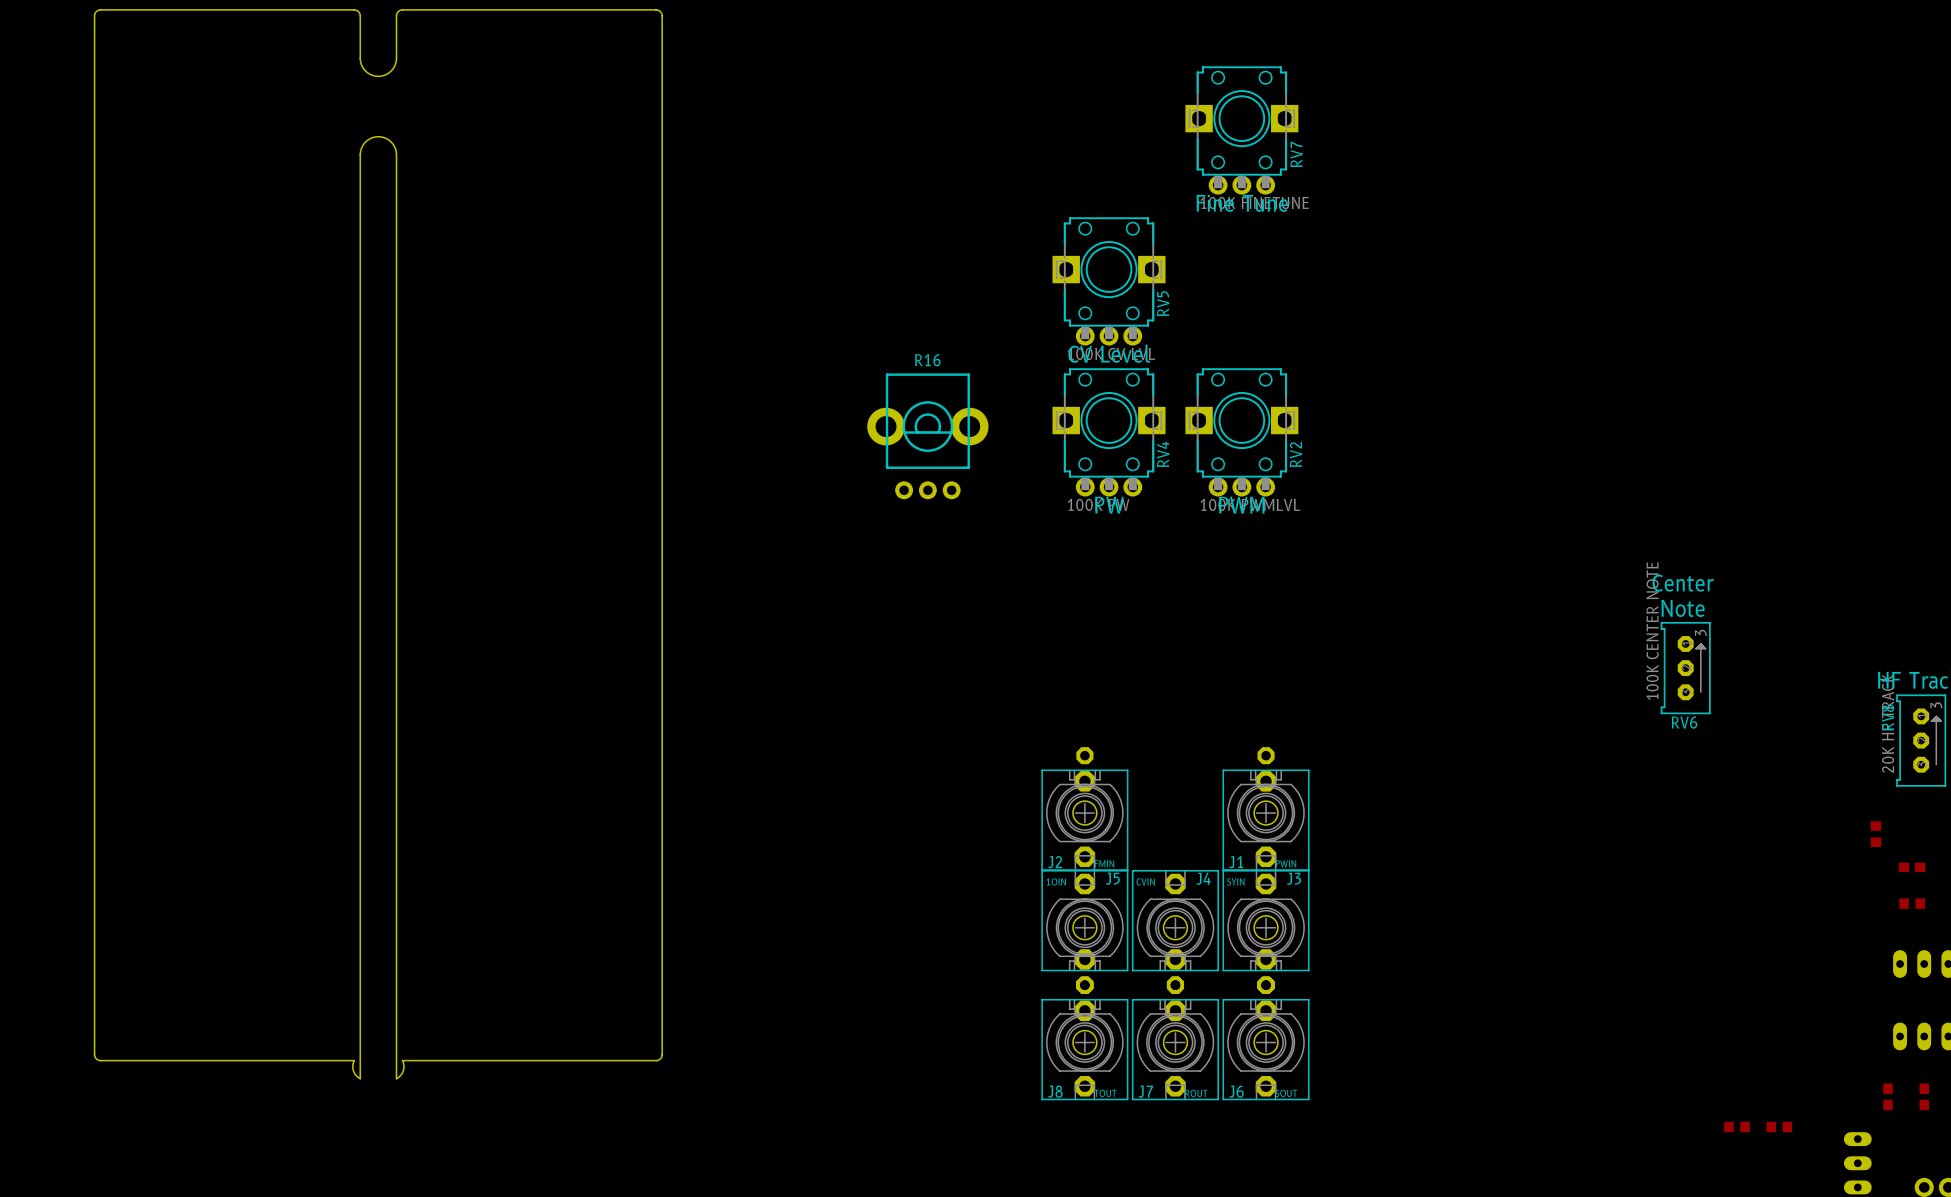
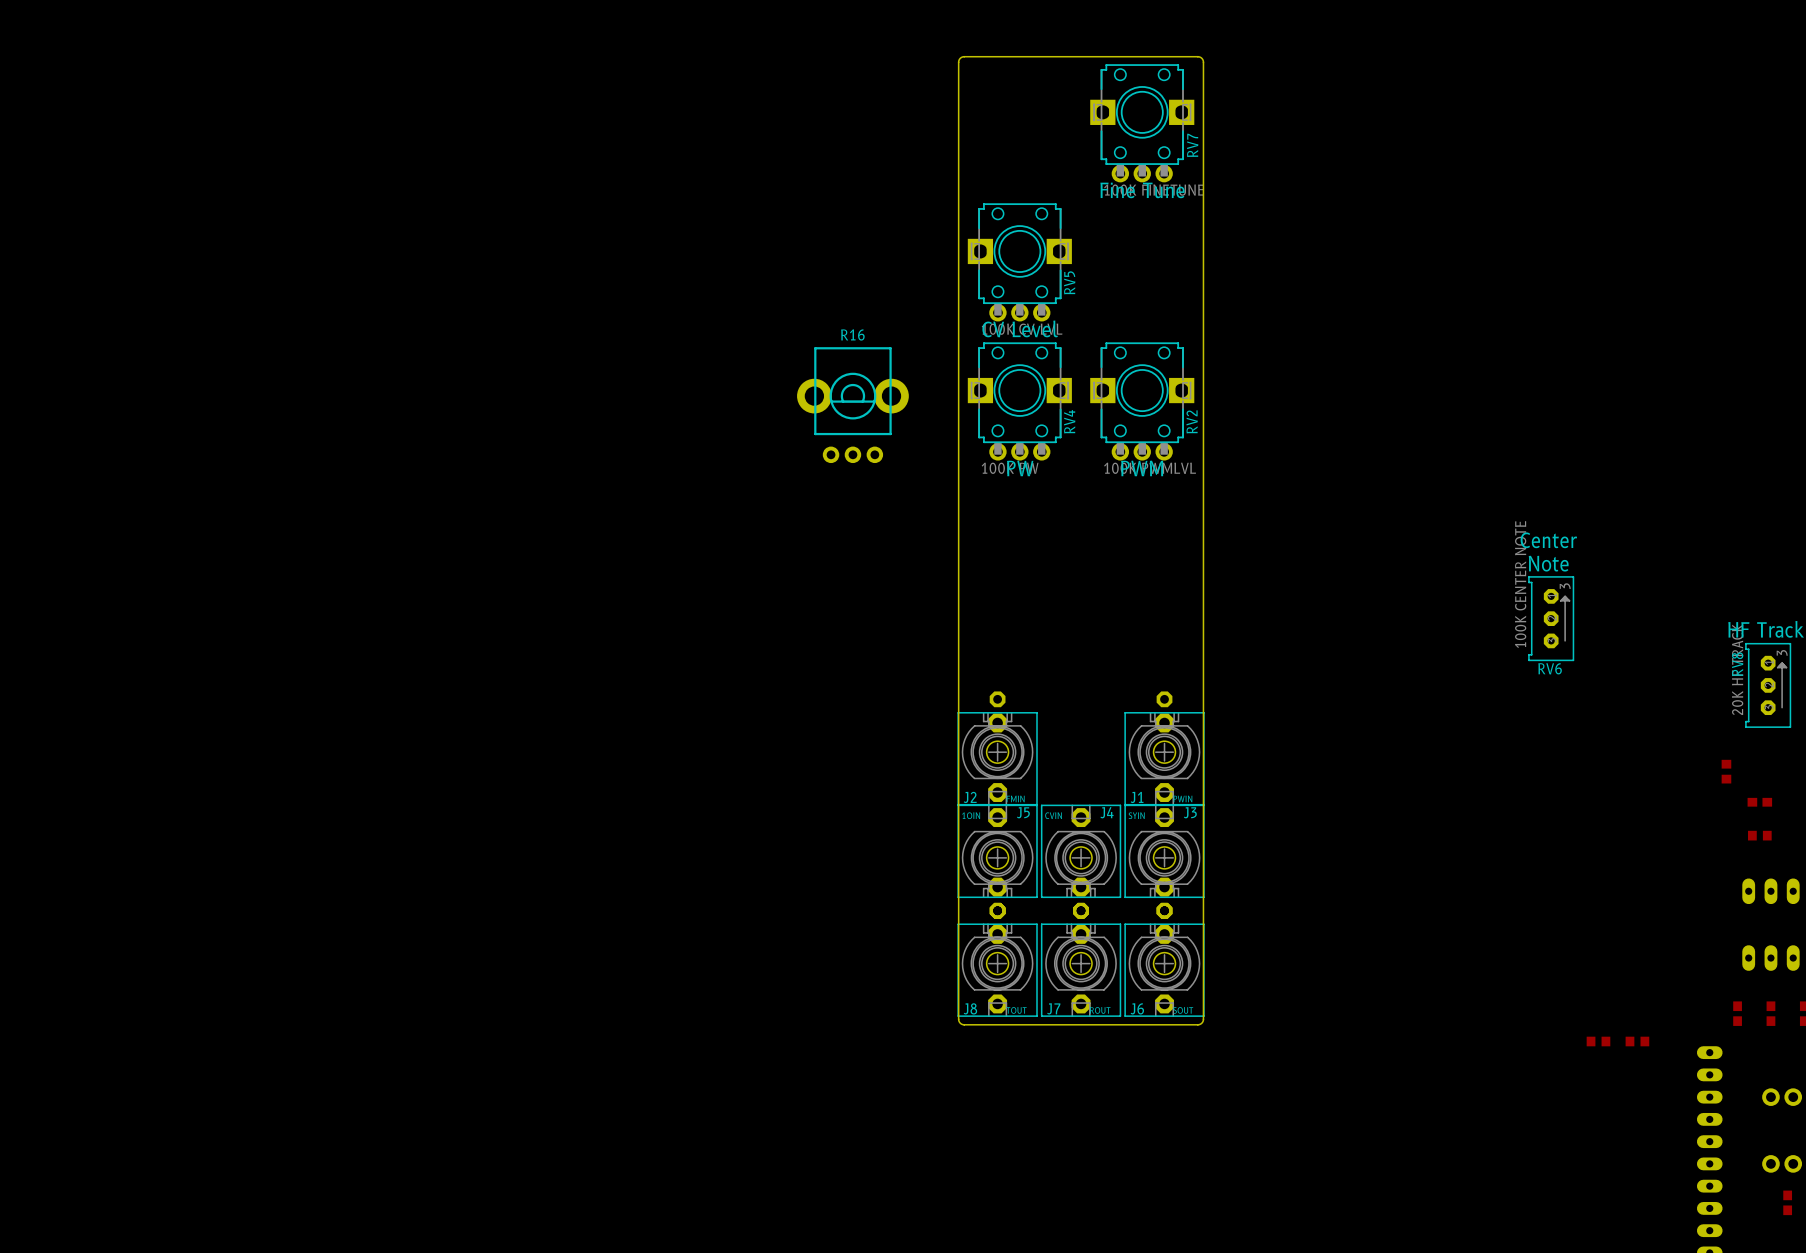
drawing: [94, 9, 663, 1079] -> none
drawing: none -> [958, 56, 1204, 1025]

